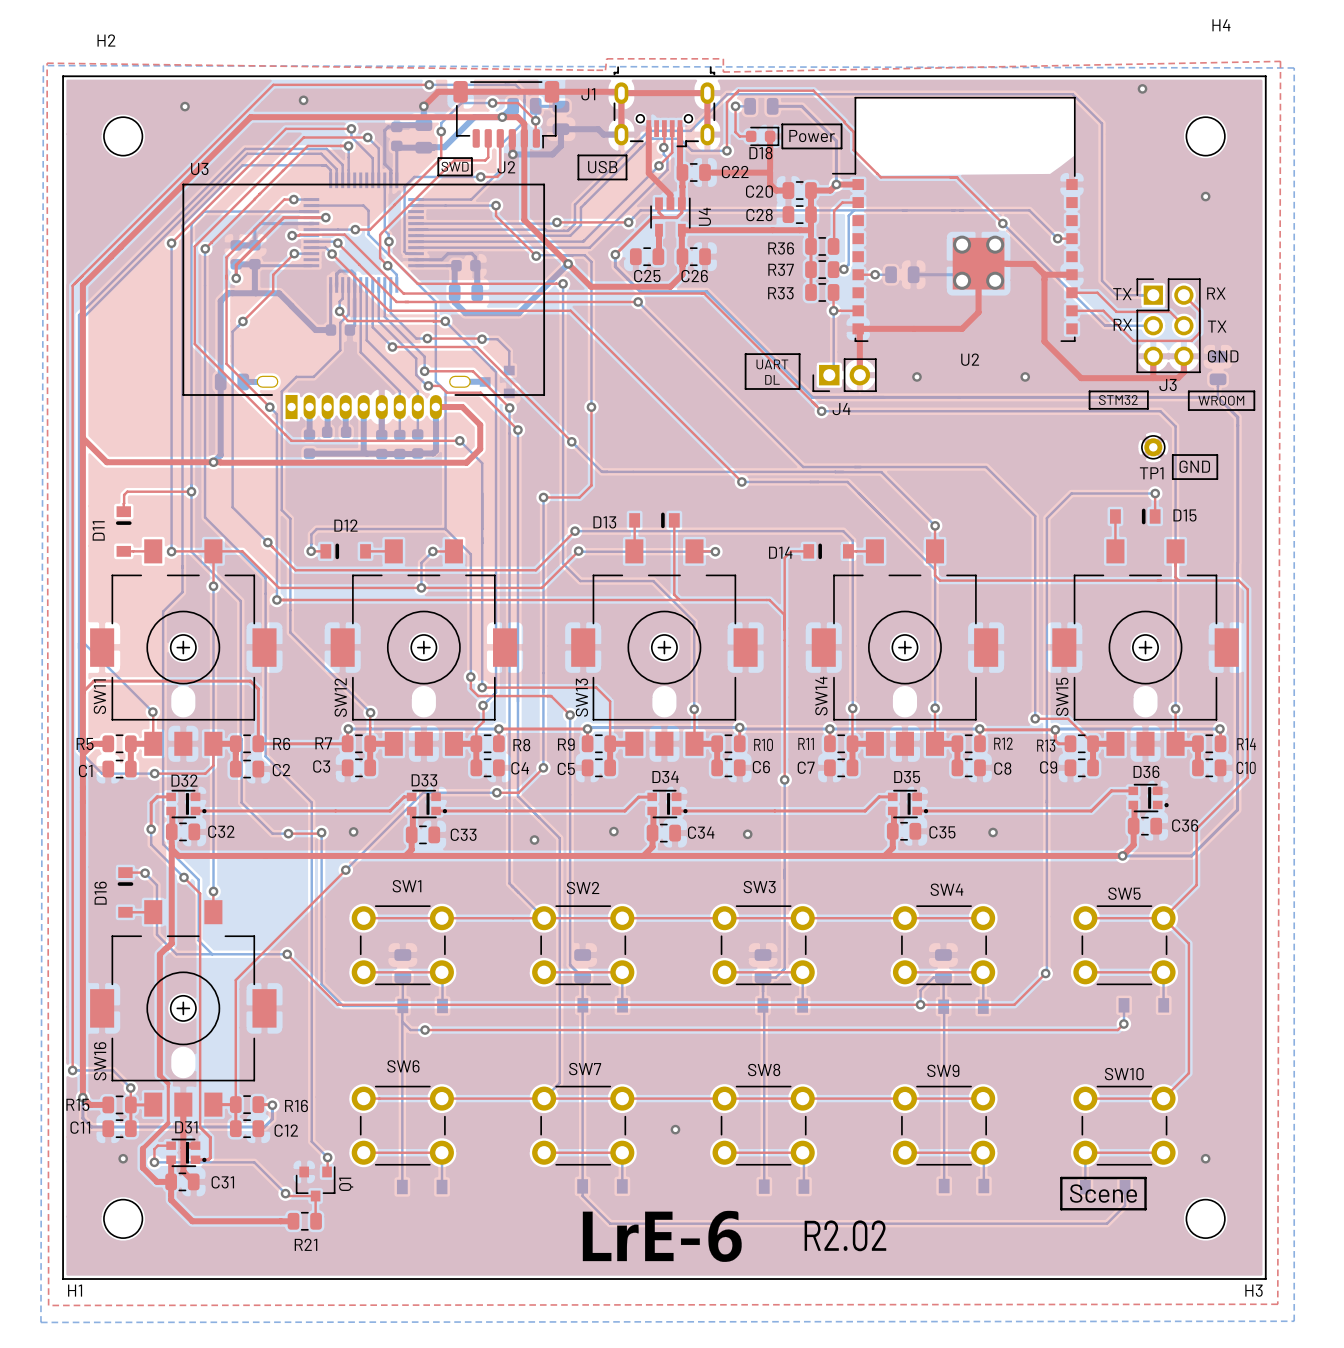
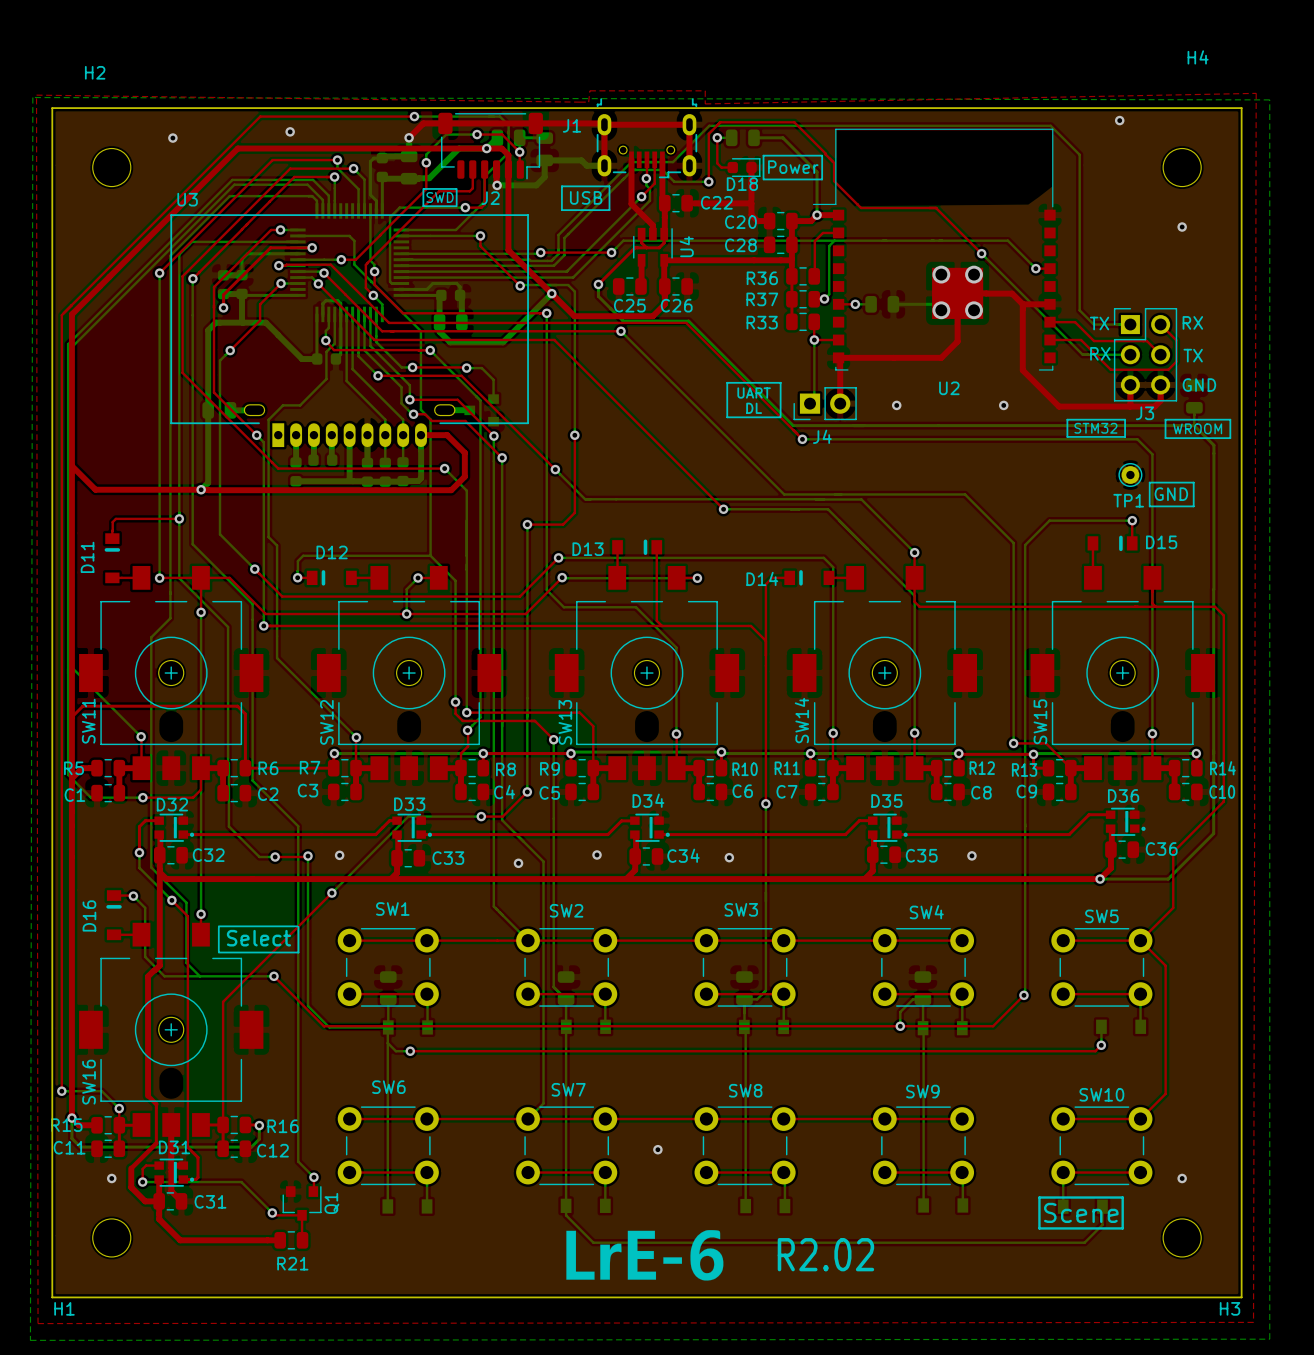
line: none -> (218, 926) (297, 926)
line: none -> (298, 926) (298, 952) (218, 952)
line: none -> (218, 927) (218, 951)
text: none -> Select (258, 938)

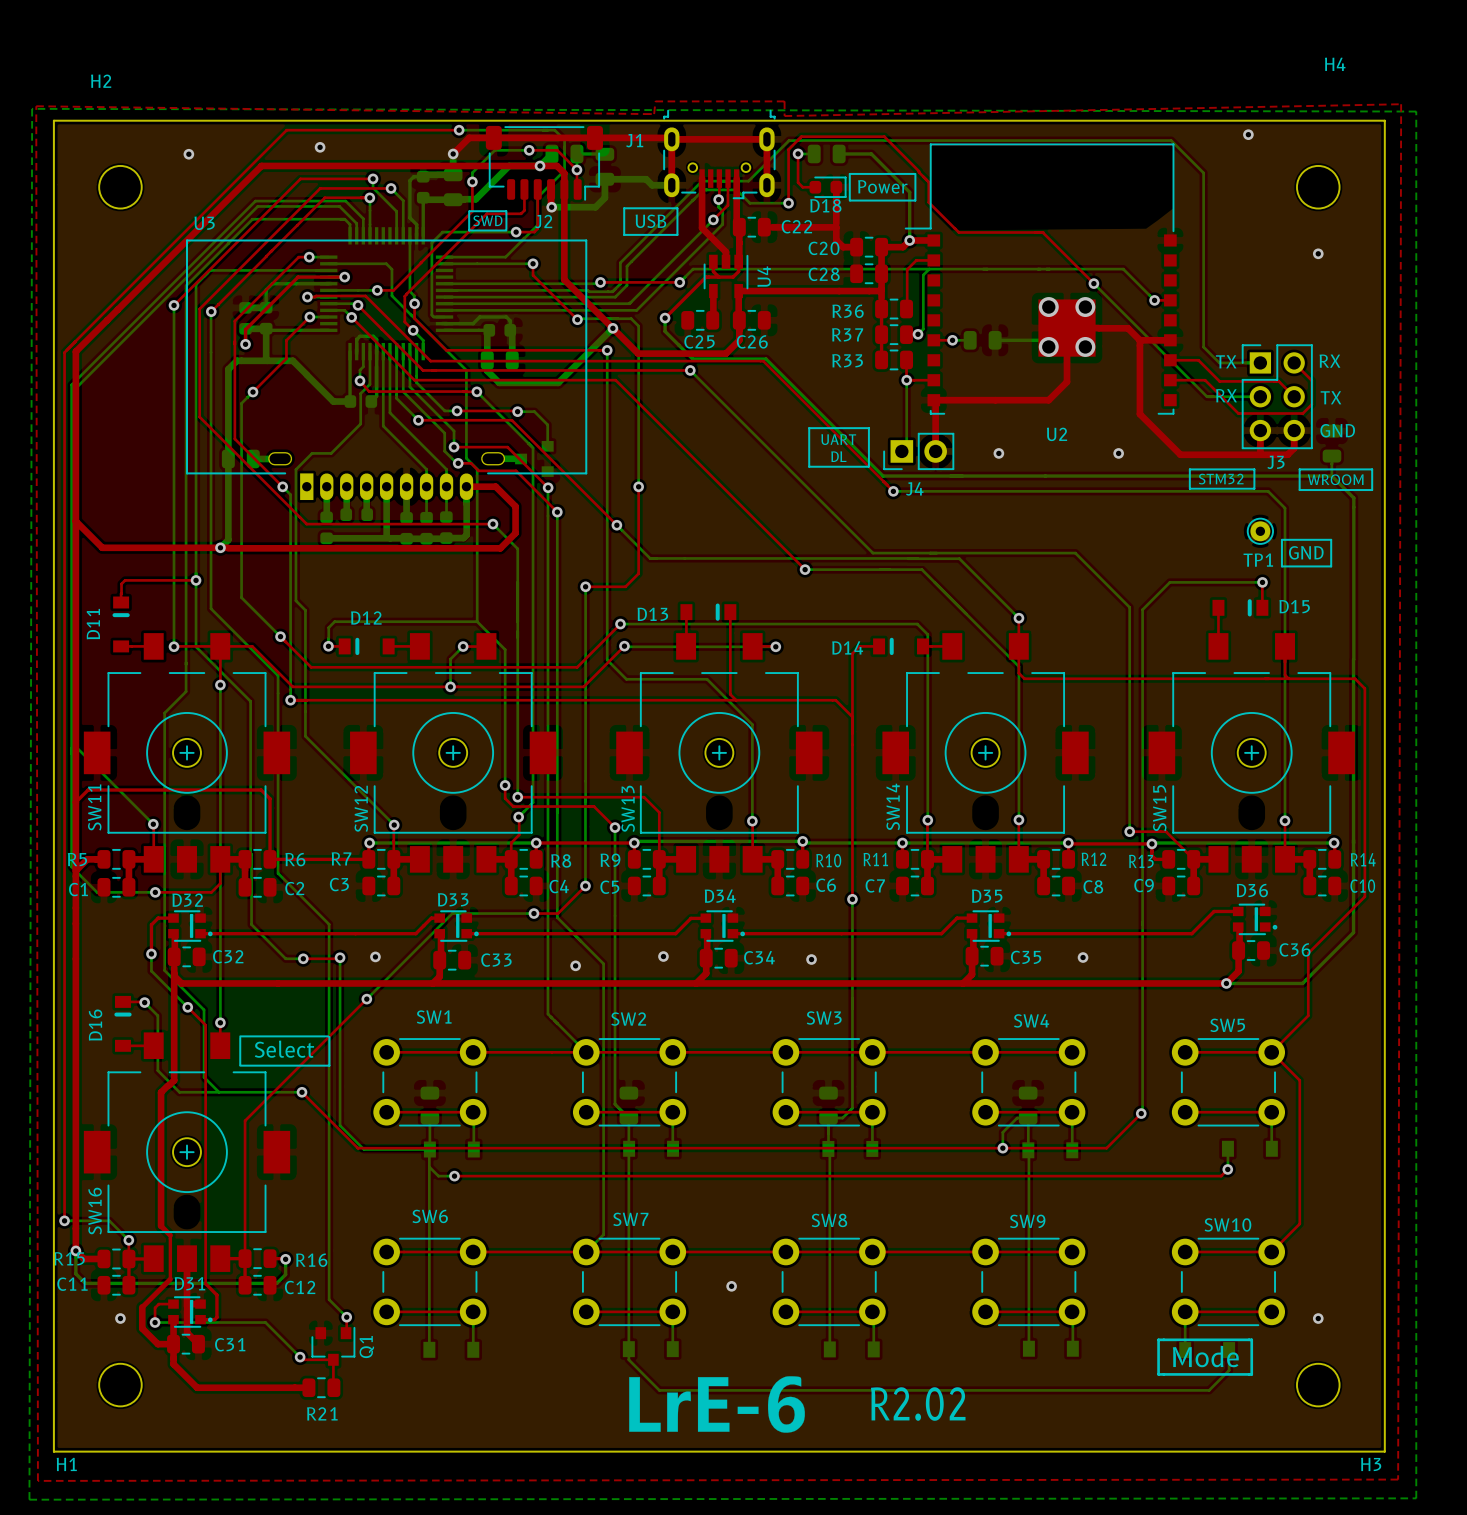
text: Scene (1081, 1212) -> Mode (1205, 1356)

